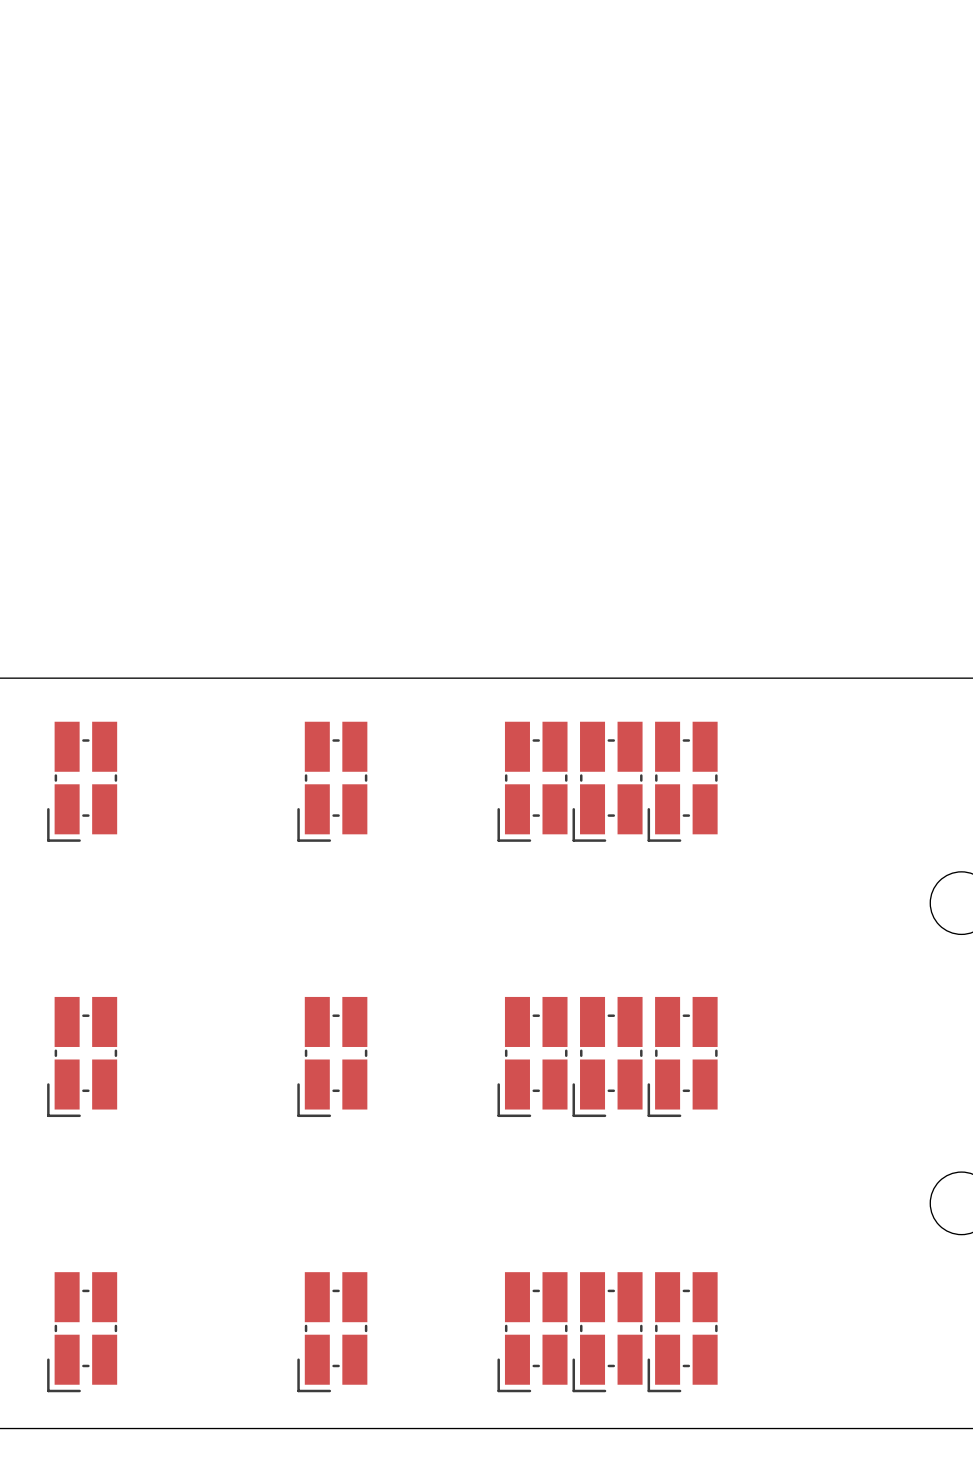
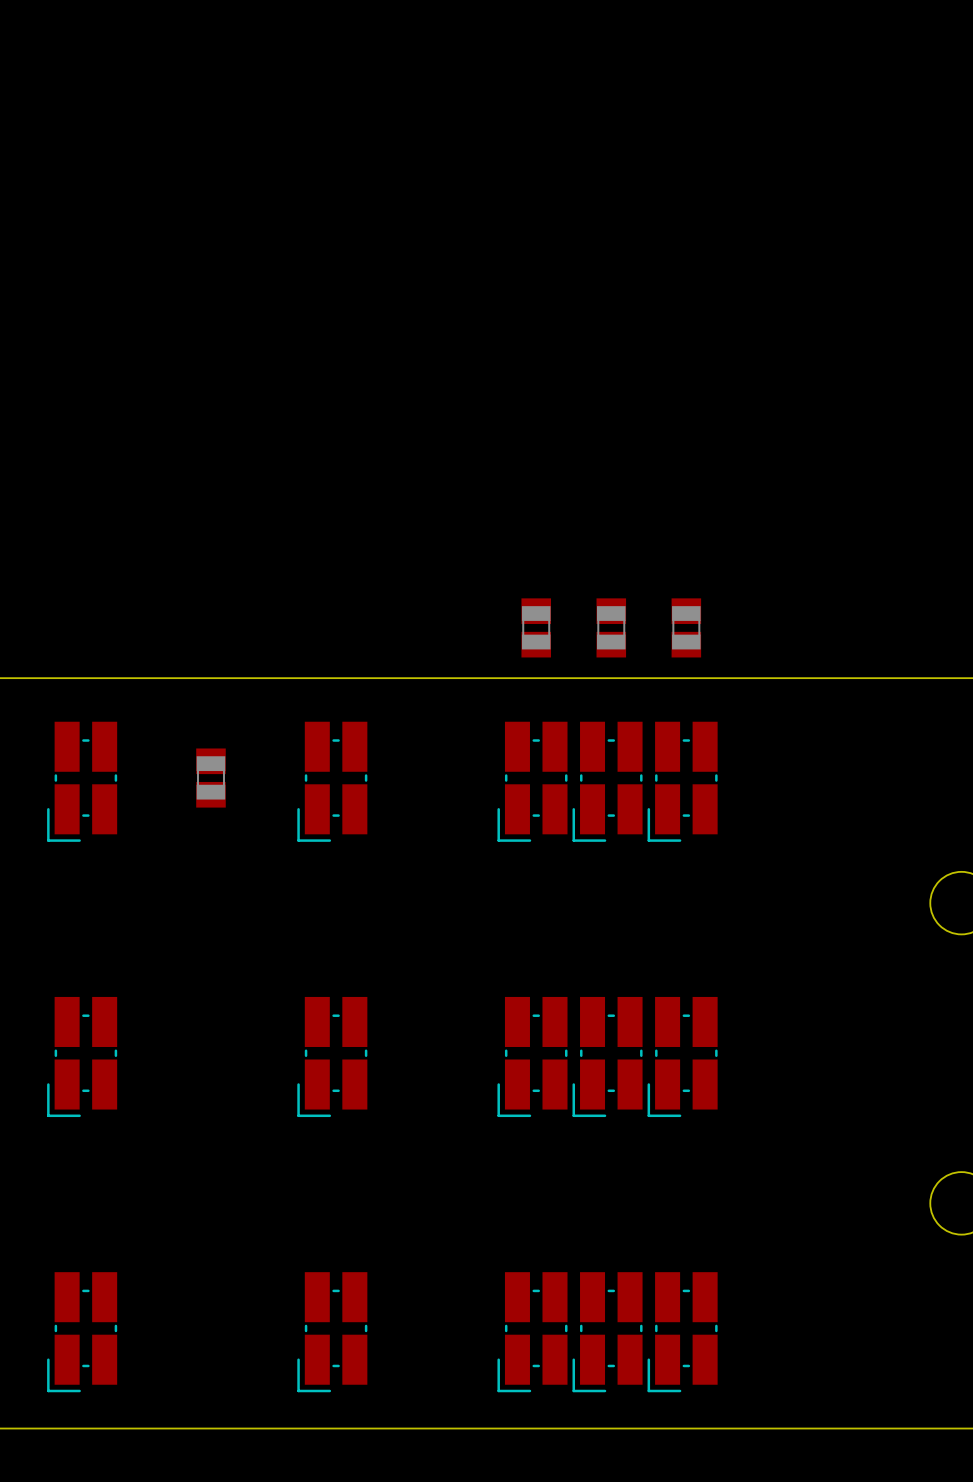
part: none -> (536, 627)
part: none -> (611, 627)
part: none -> (686, 627)
part: none -> (210, 778)

